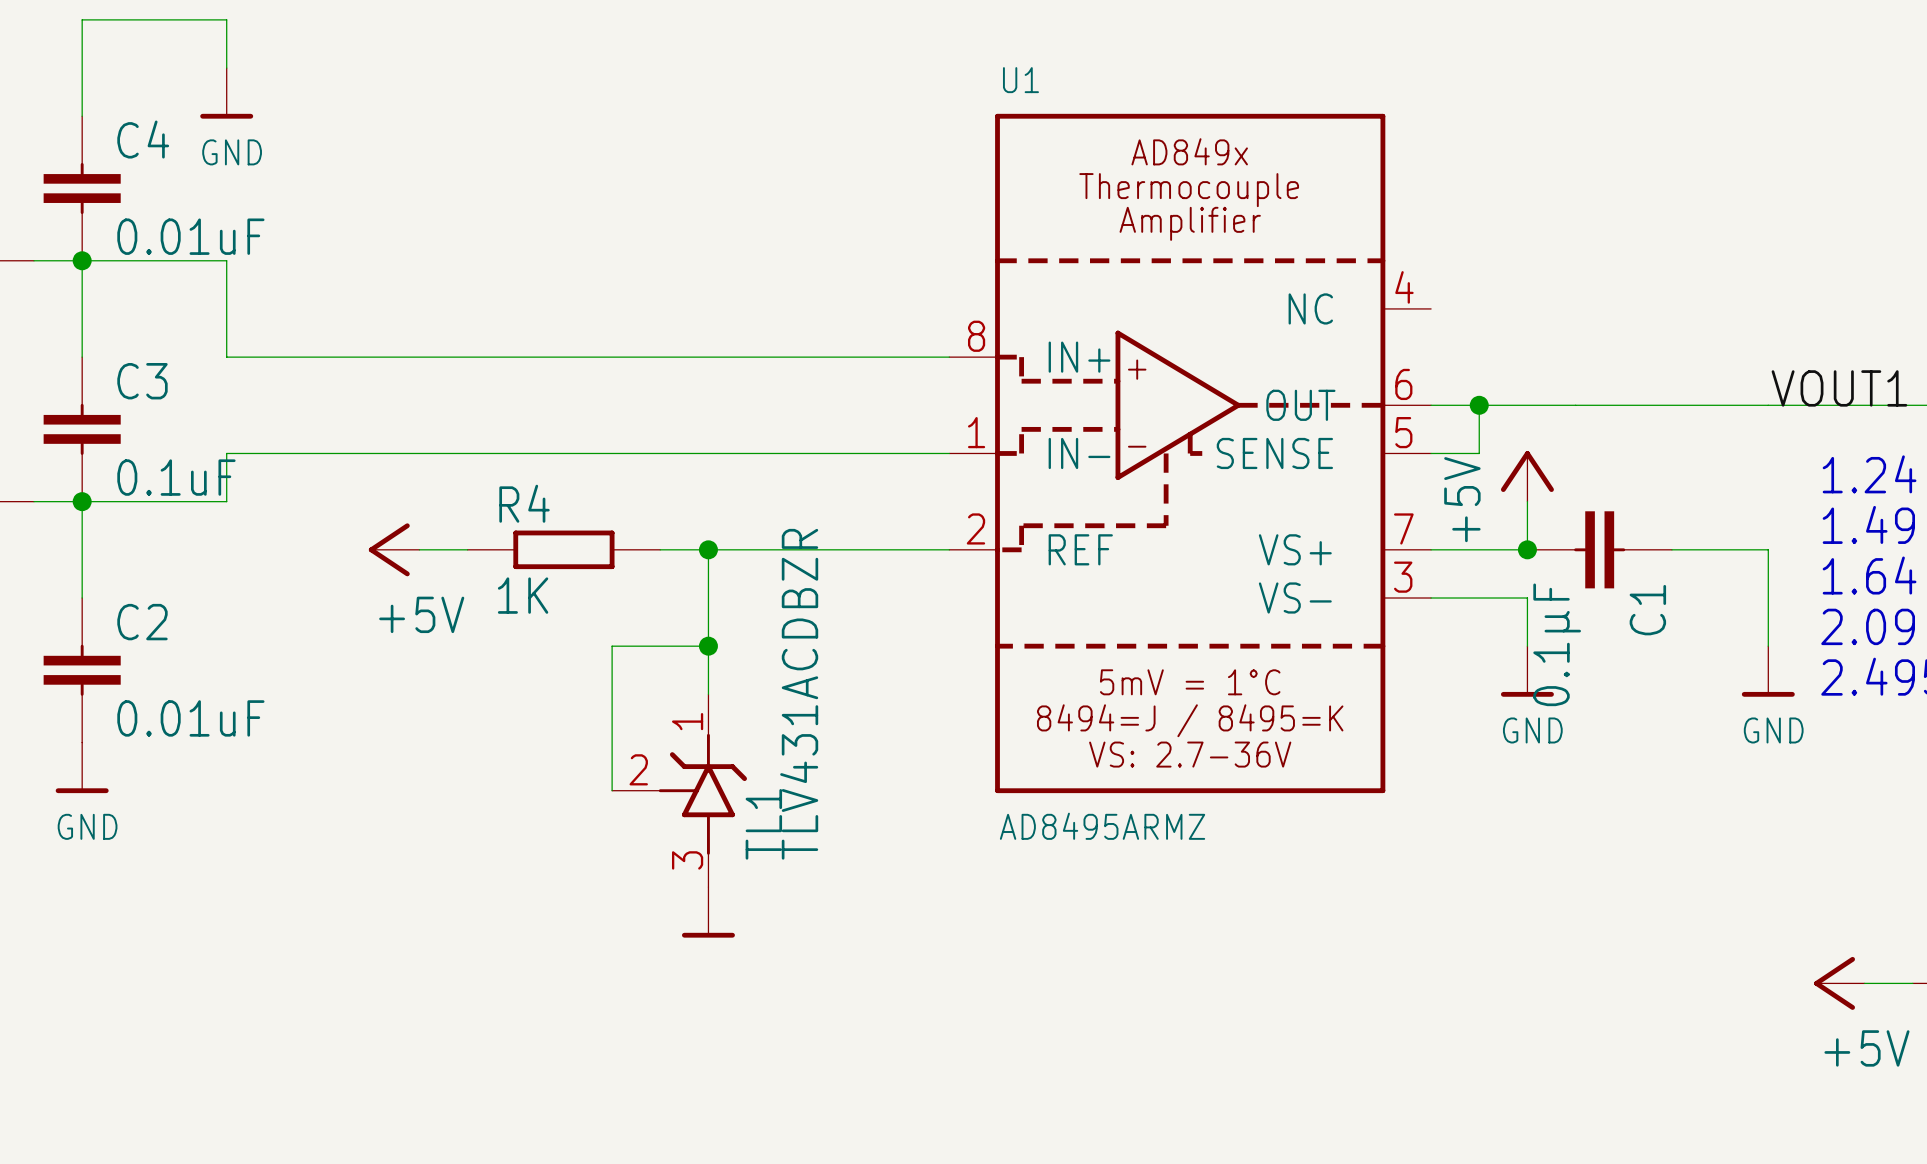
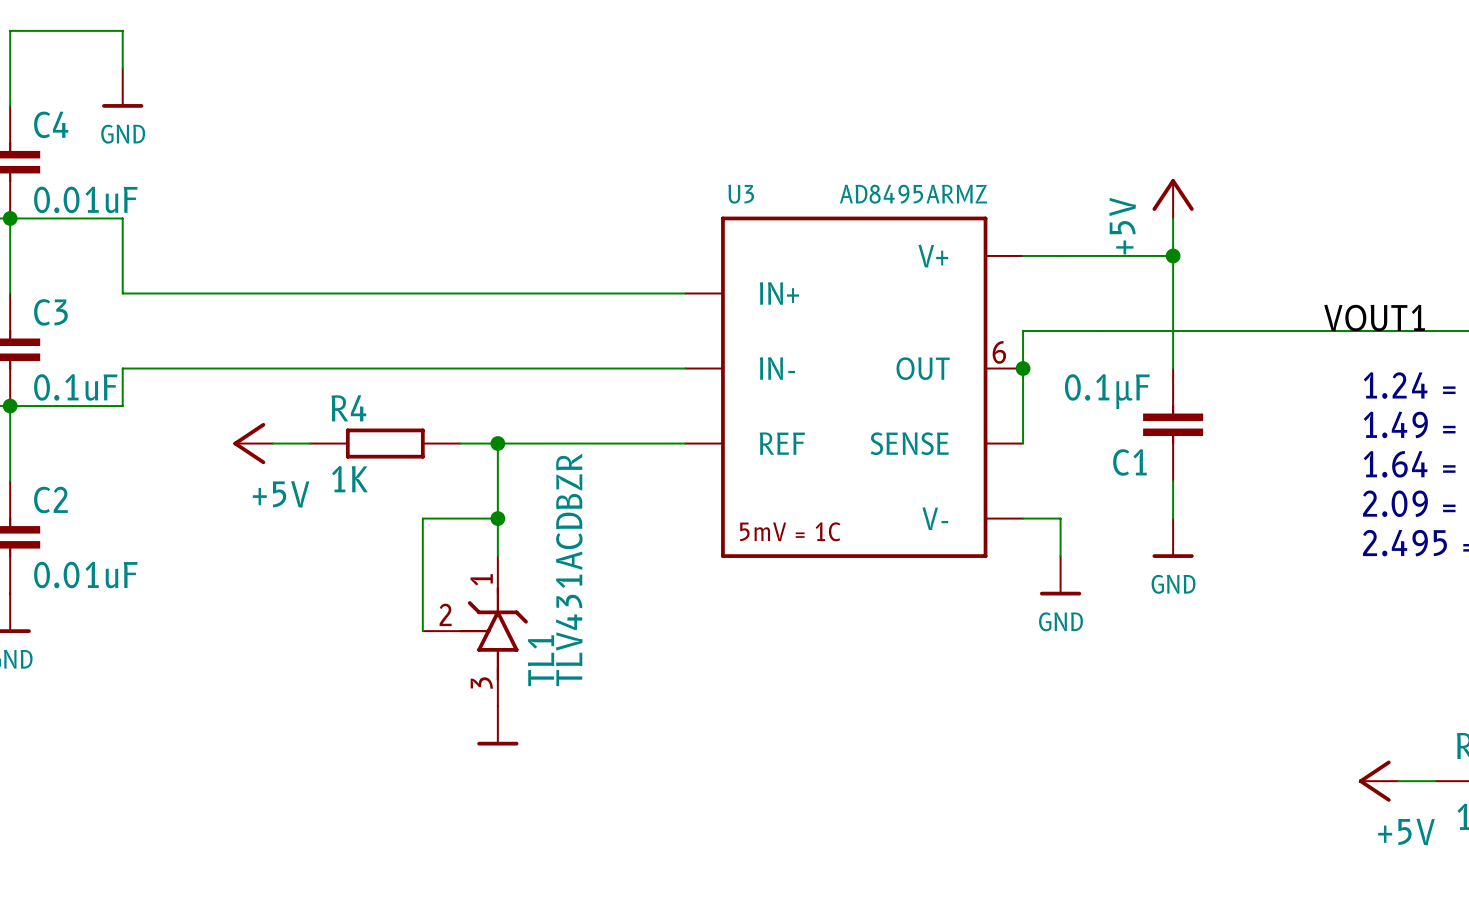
wire: none -> (1173, 218) (1173, 368)
wire: none -> (1023, 255) (1173, 255)
junction: none -> (1173, 255)
wire: (1479, 405) (1479, 453) (1431, 453) -> none
junction: (1479, 405) -> none
U1: AD8495ARMZ (1190, 453) -> none
junction: none -> (1023, 368)
power symbol position: +5V (1527, 476) -> +5V (1173, 198)
U3: none -> AD8495ARMZ (854, 387)
wire: (1527, 501) (1527, 549) (1431, 549) -> none
junction: (1527, 549) -> none
C1 rotation: 0° (1599, 549) -> 90° clockwise (1173, 424)
wire: (1671, 549) (1768, 549) (1768, 646) -> none
wire: (1431, 598) (1527, 598) (1527, 646) -> none
wire: none -> (1173, 481) (1173, 518)
wire: none -> (1023, 518) (1060, 518) (1060, 556)
power symbol position: GND (1527, 671) -> GND (1173, 538)
power symbol: GND (1768, 671) -> none
power symbol: none -> GND (1060, 575)

